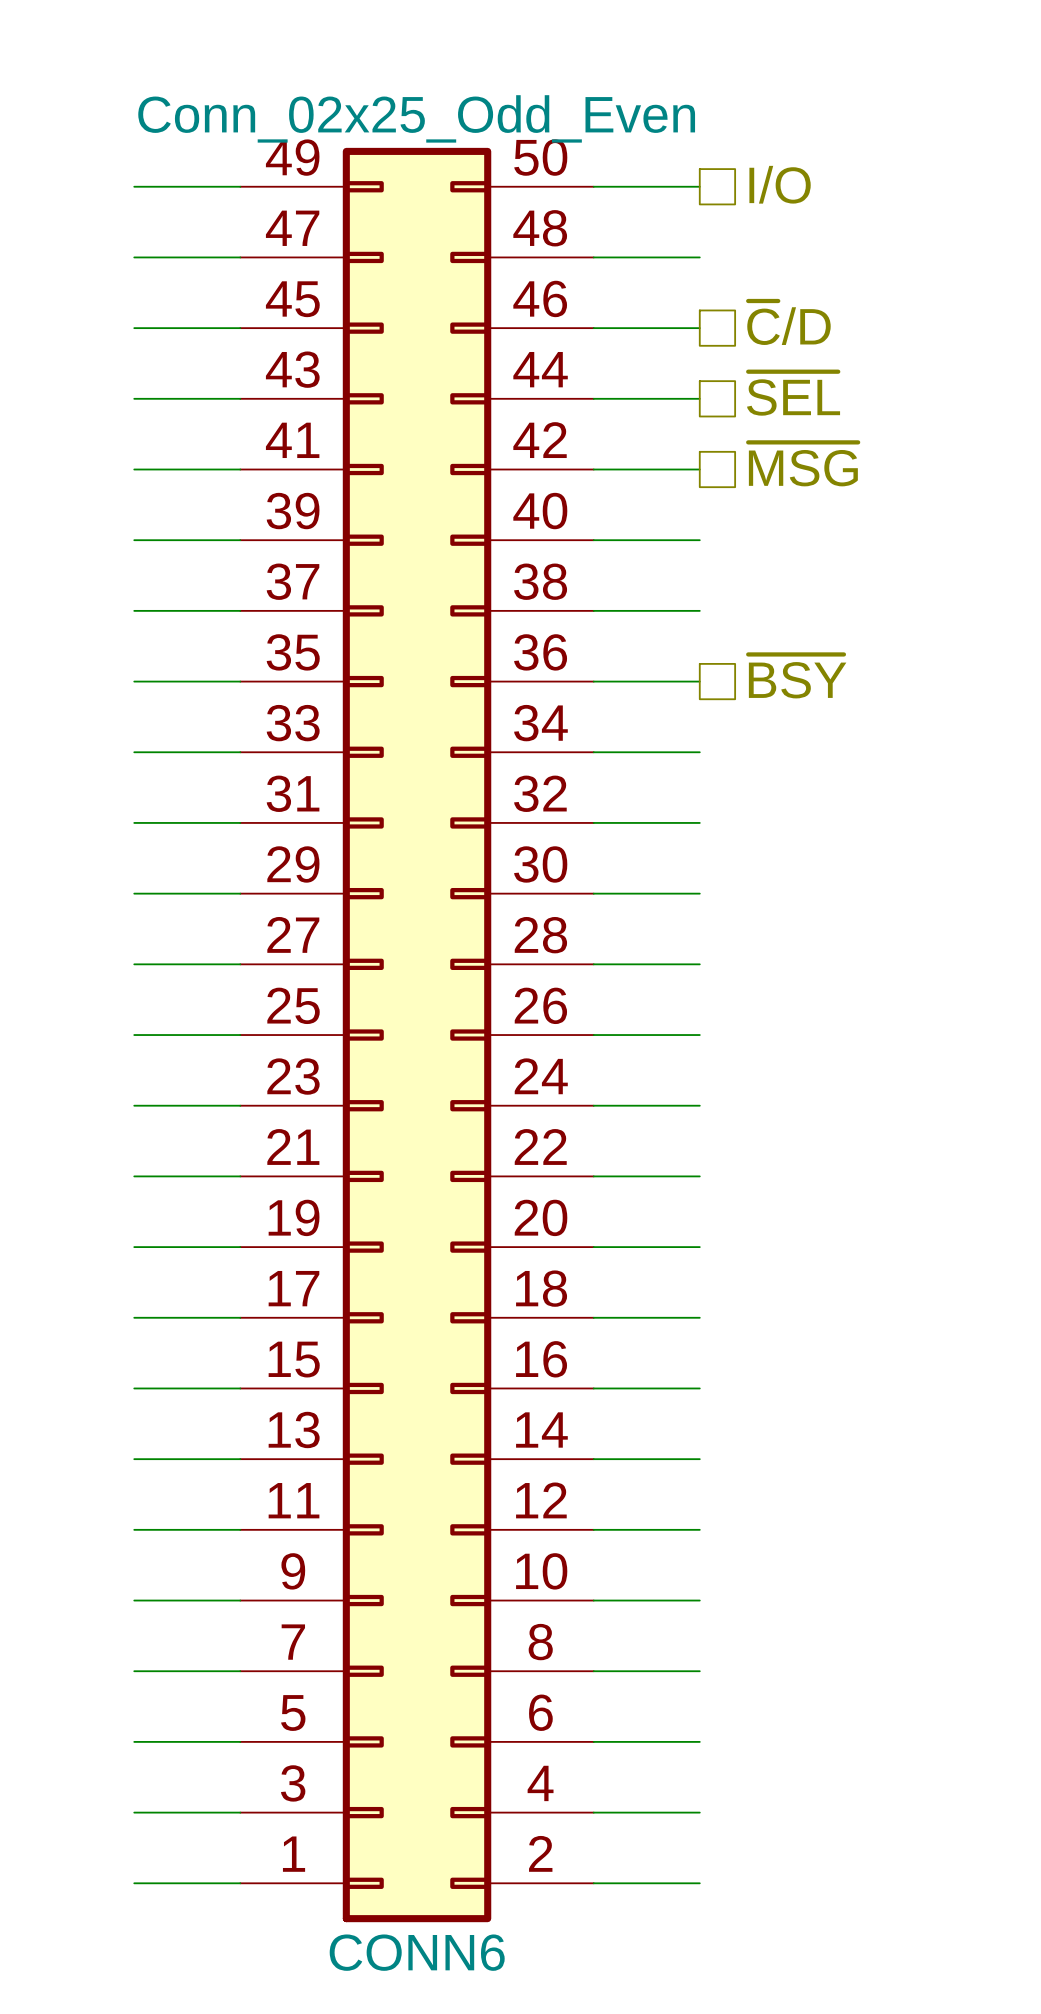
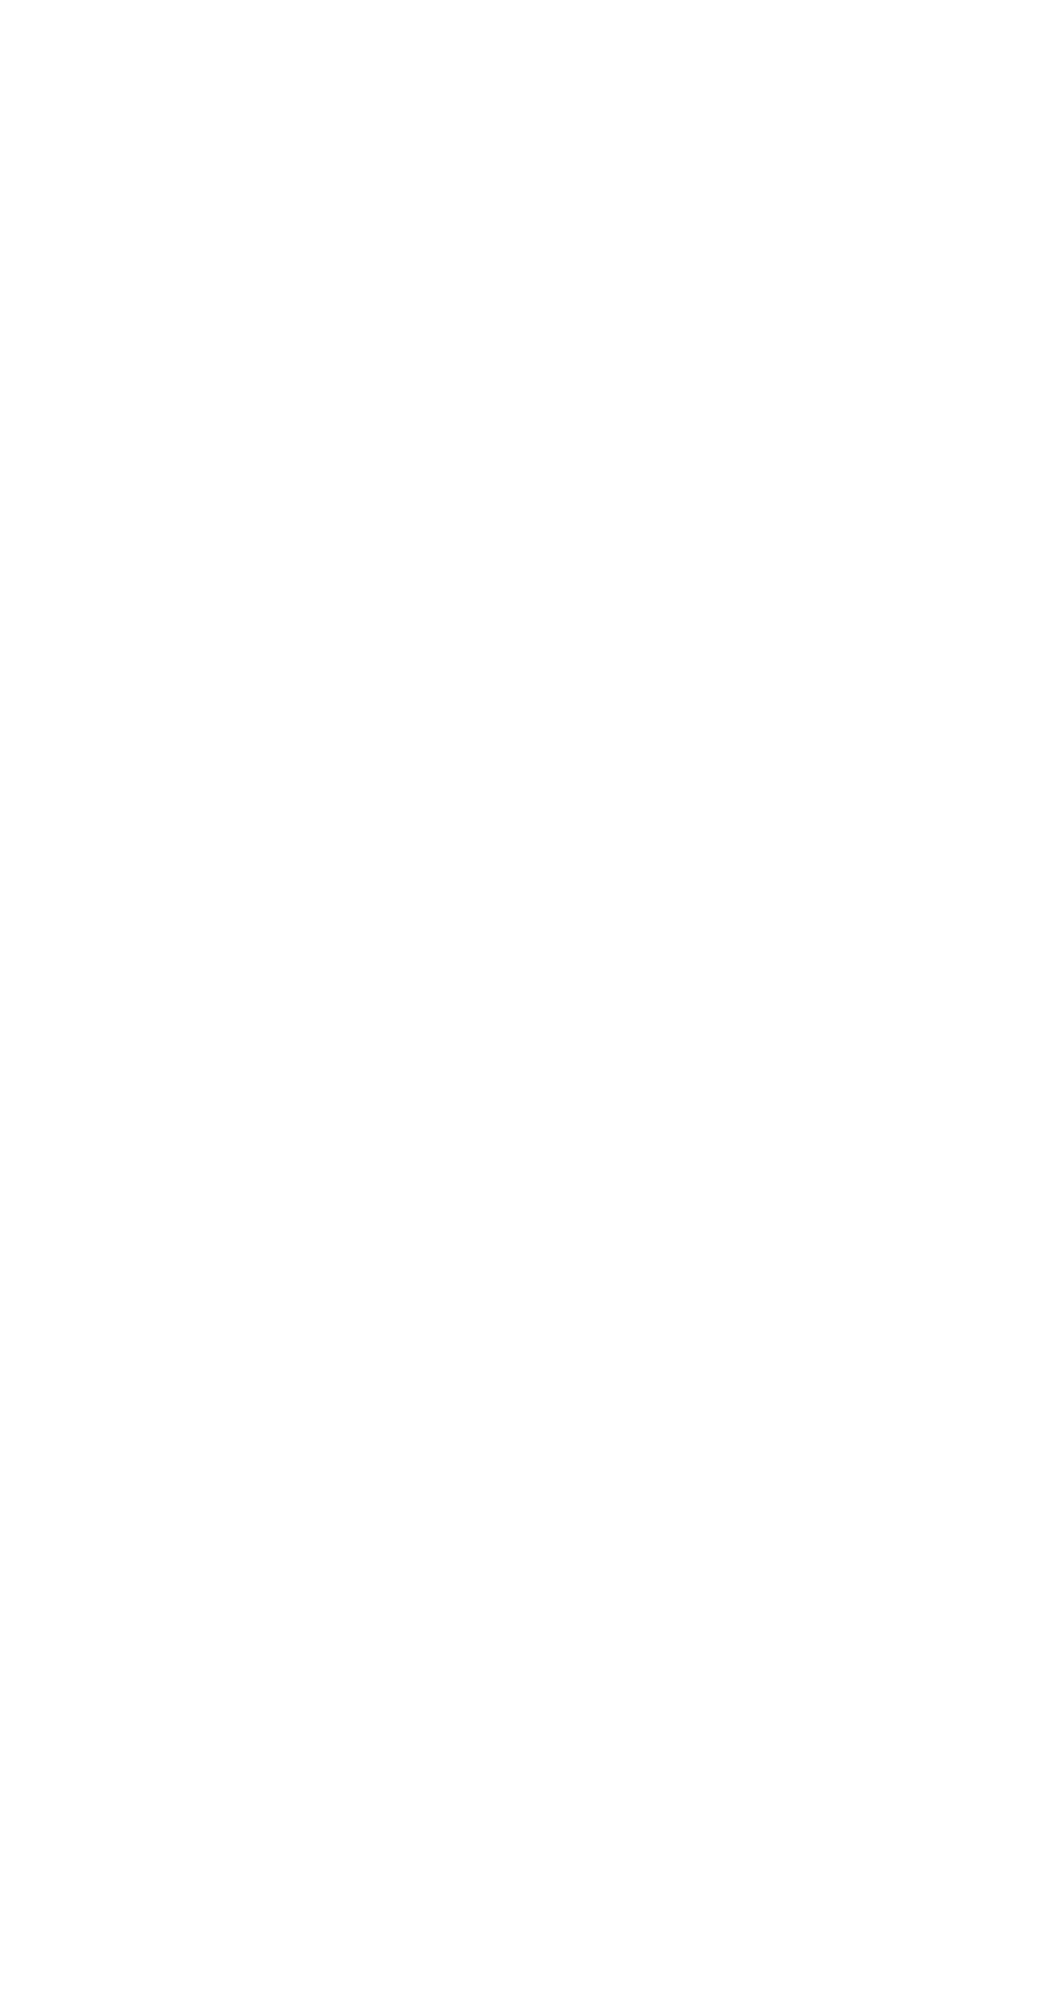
hierarchical label: I/O (780, 184) -> none
wire: (134, 186) (240, 186) -> none
wire: (593, 186) (699, 186) -> none
wire: (134, 257) (240, 257) -> none
wire: (593, 257) (699, 257) -> none
hierarchical label: ~{C}/D (788, 322) -> none
wire: (134, 328) (240, 328) -> none
wire: (593, 328) (699, 328) -> none
hierarchical label: ~{SEL} (793, 393) -> none
wire: (134, 398) (240, 398) -> none
wire: (593, 398) (699, 398) -> none
hierarchical label: ~{MSG} (803, 464) -> none
wire: (134, 469) (240, 469) -> none
wire: (593, 469) (699, 469) -> none
wire: (134, 540) (240, 540) -> none
wire: (593, 540) (699, 540) -> none
wire: (134, 610) (240, 610) -> none
wire: (593, 610) (699, 610) -> none
hierarchical label: ~{BSY} (797, 676) -> none
wire: (134, 681) (240, 681) -> none
wire: (593, 681) (699, 681) -> none
wire: (134, 752) (240, 752) -> none
wire: (593, 752) (699, 752) -> none
wire: (134, 822) (240, 822) -> none
wire: (593, 822) (699, 822) -> none
wire: (134, 893) (240, 893) -> none
wire: (593, 893) (699, 893) -> none
wire: (134, 964) (240, 964) -> none
wire: (593, 964) (699, 964) -> none
wire: (134, 1035) (240, 1035) -> none
CONN6: Conn_02x25_Odd_Even (417, 1035) -> none
wire: (593, 1035) (699, 1035) -> none
wire: (134, 1105) (240, 1105) -> none
wire: (593, 1105) (699, 1105) -> none
wire: (134, 1176) (240, 1176) -> none
wire: (593, 1176) (699, 1176) -> none
wire: (134, 1247) (240, 1247) -> none
wire: (593, 1247) (699, 1247) -> none
wire: (134, 1317) (240, 1317) -> none
wire: (593, 1317) (699, 1317) -> none
wire: (134, 1388) (240, 1388) -> none
wire: (593, 1388) (699, 1388) -> none
wire: (134, 1459) (240, 1459) -> none
wire: (593, 1459) (699, 1459) -> none
wire: (134, 1529) (240, 1529) -> none
wire: (593, 1529) (699, 1529) -> none
wire: (134, 1600) (240, 1600) -> none
wire: (593, 1600) (699, 1600) -> none
wire: (134, 1671) (240, 1671) -> none
wire: (593, 1671) (699, 1671) -> none
wire: (134, 1741) (240, 1741) -> none
wire: (593, 1741) (699, 1741) -> none
wire: (134, 1812) (240, 1812) -> none
wire: (593, 1812) (699, 1812) -> none
wire: (134, 1883) (240, 1883) -> none
wire: (593, 1883) (699, 1883) -> none

